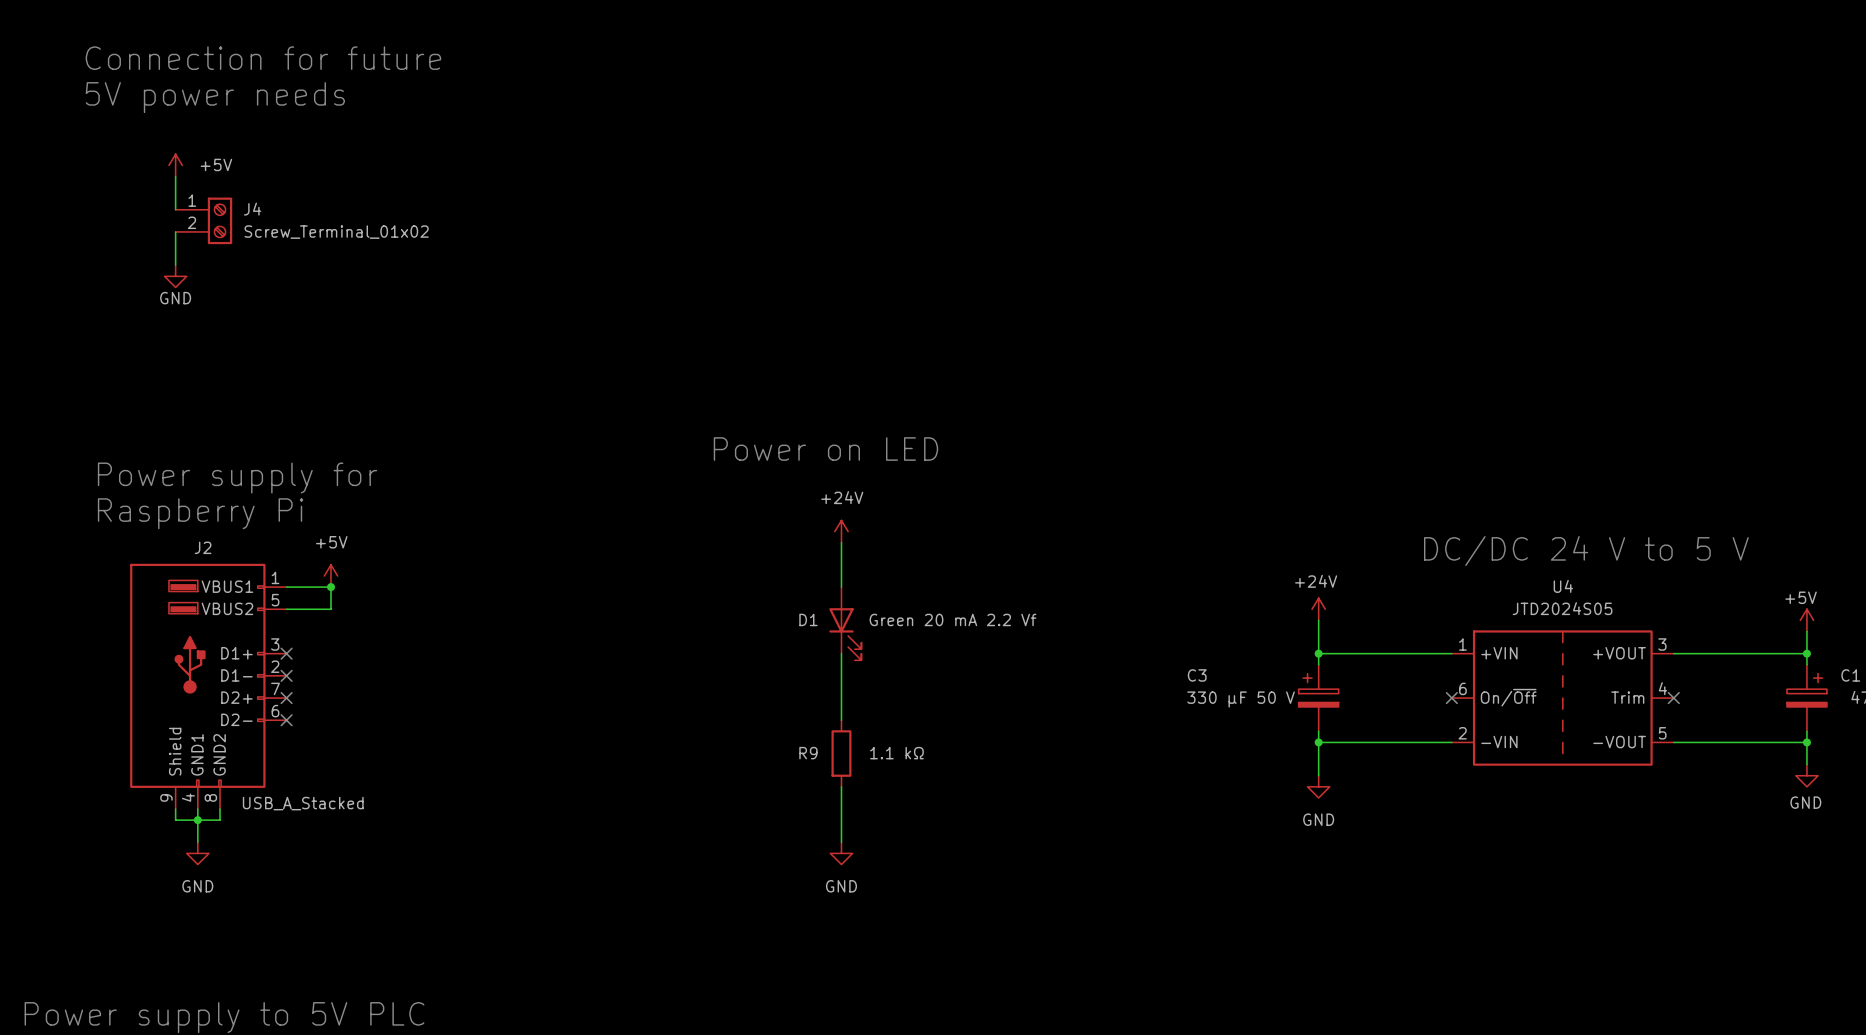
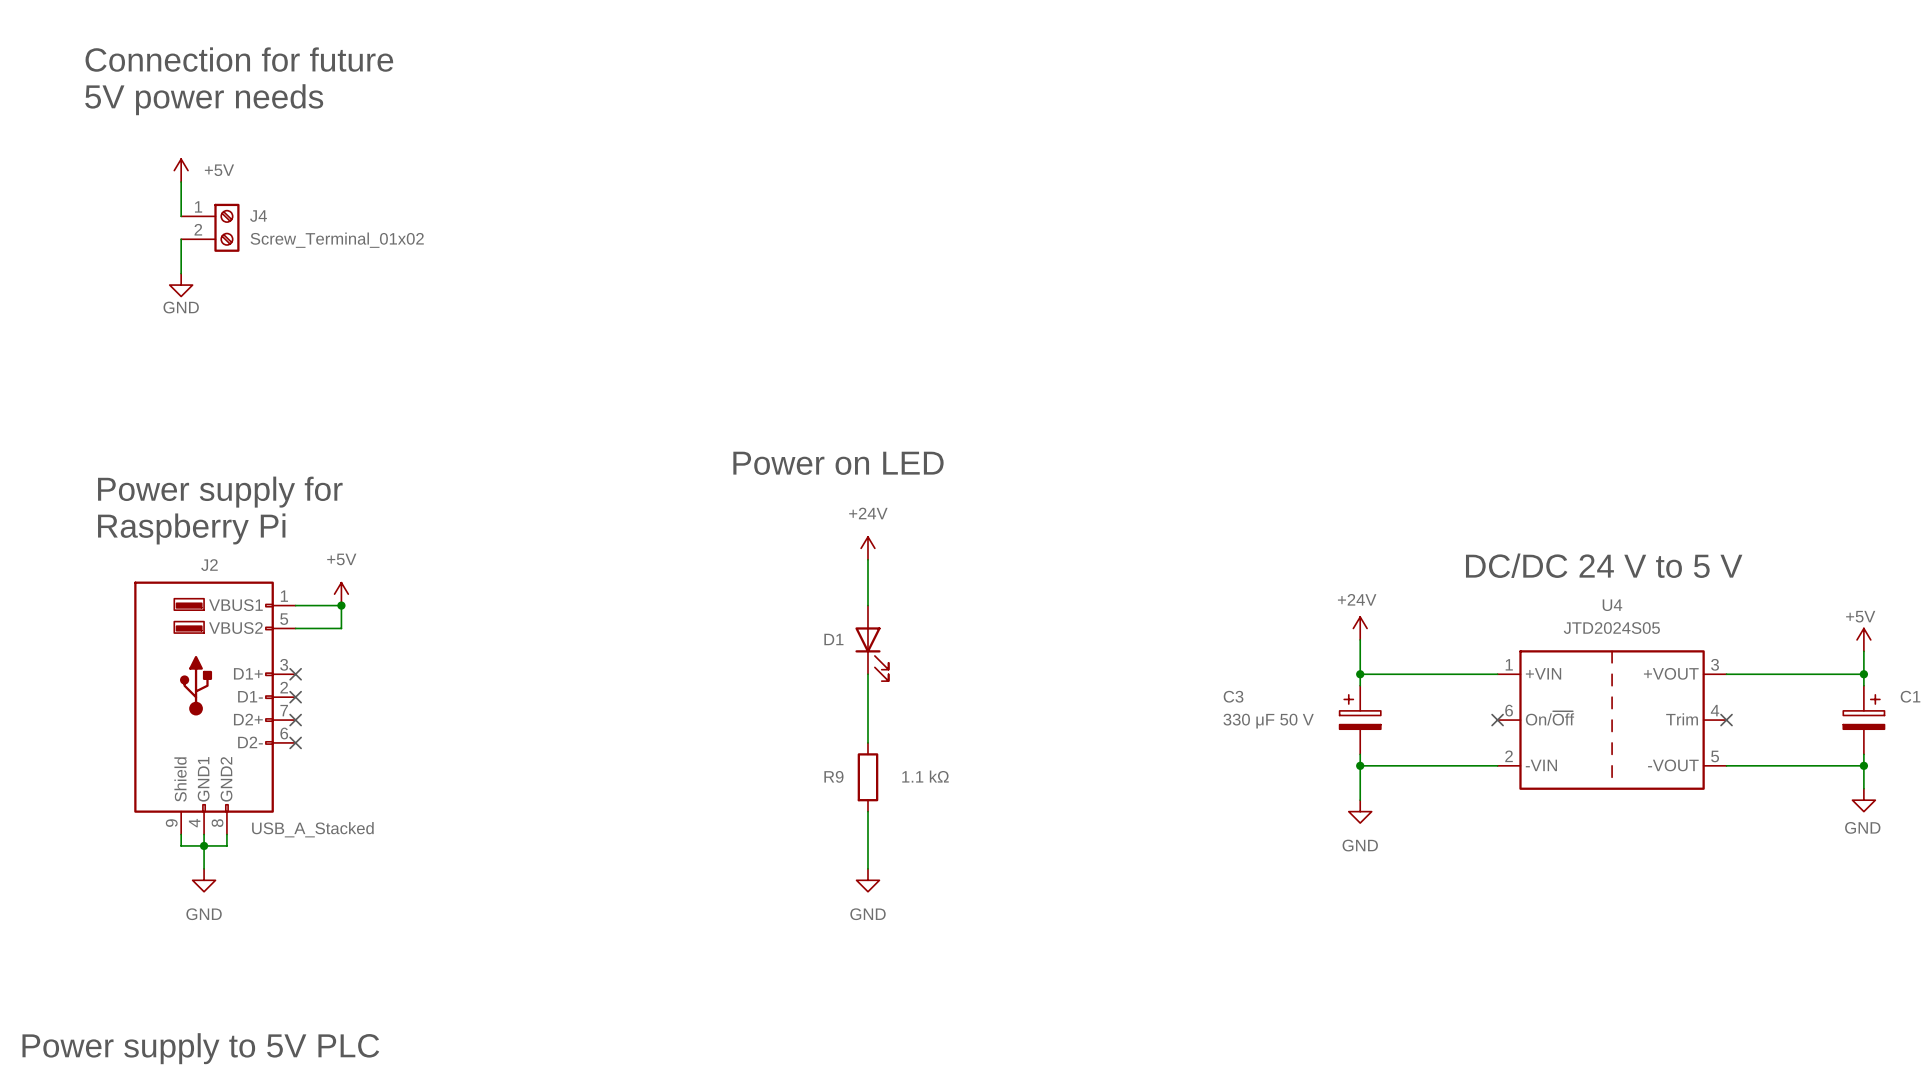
D1 value: Green 20 mA 2.2 Vf (952, 619) -> none

